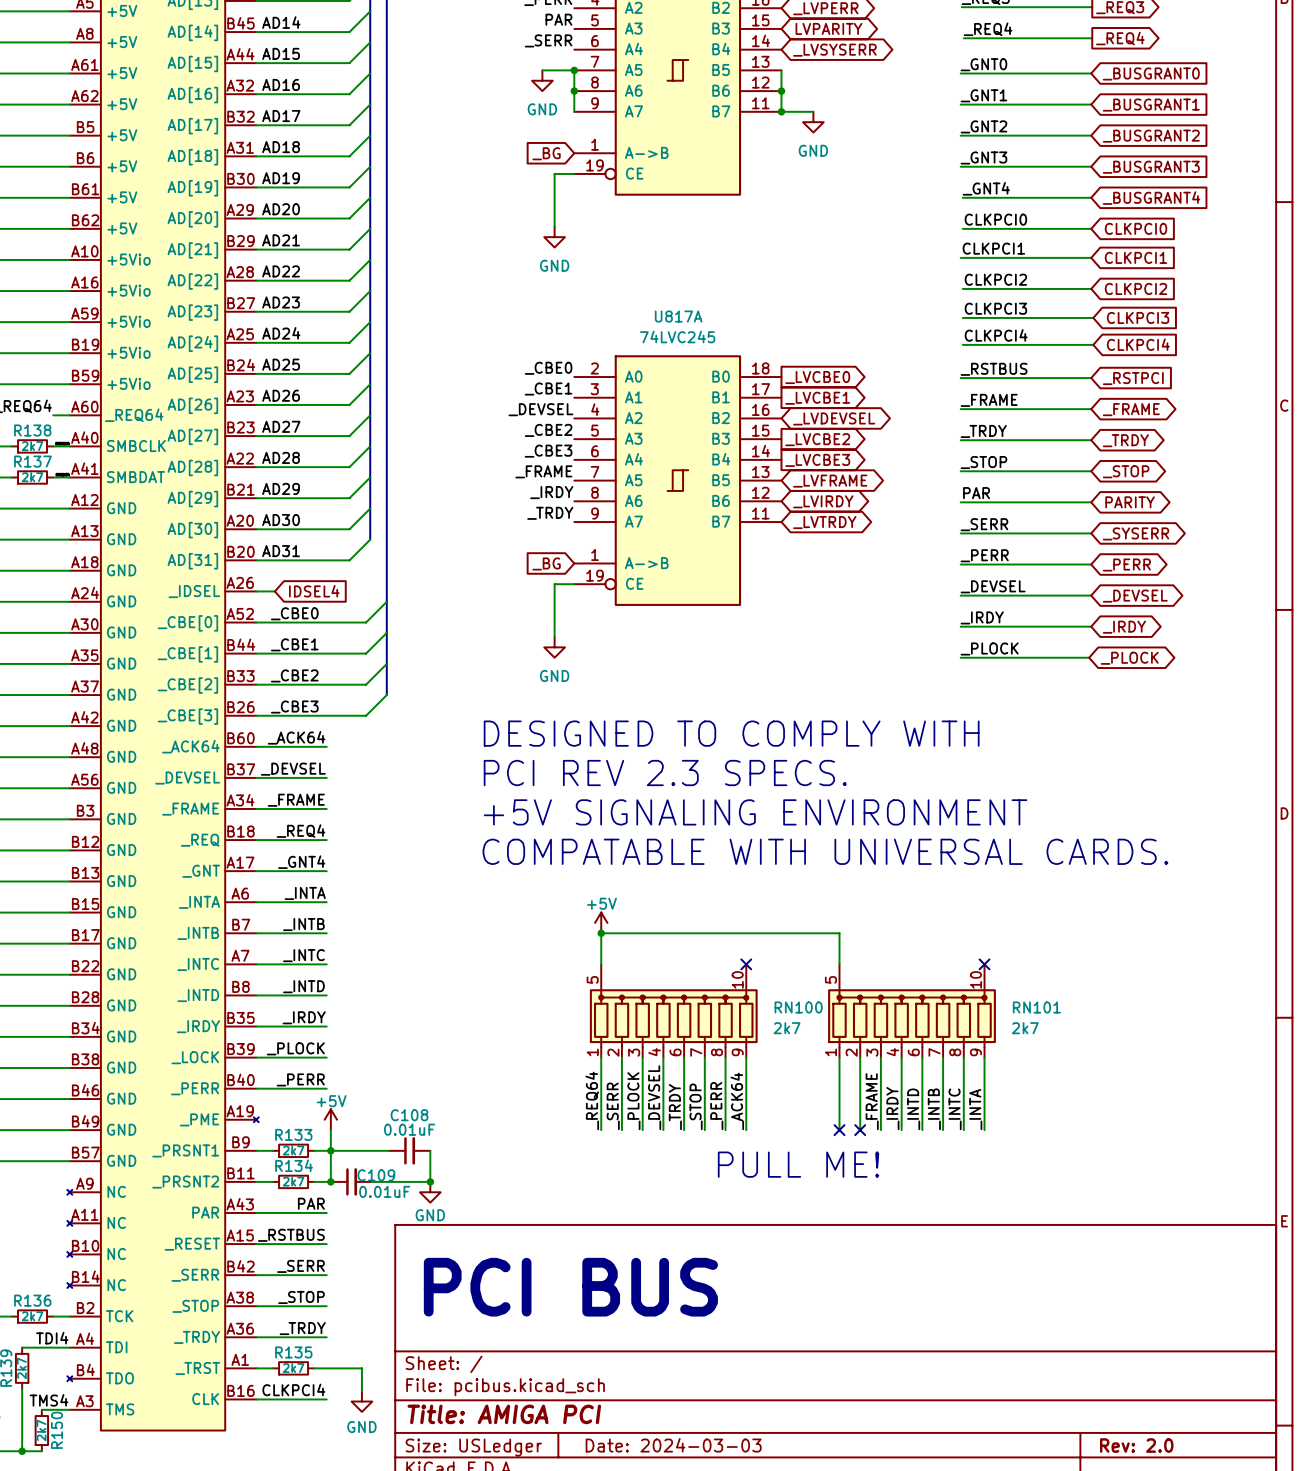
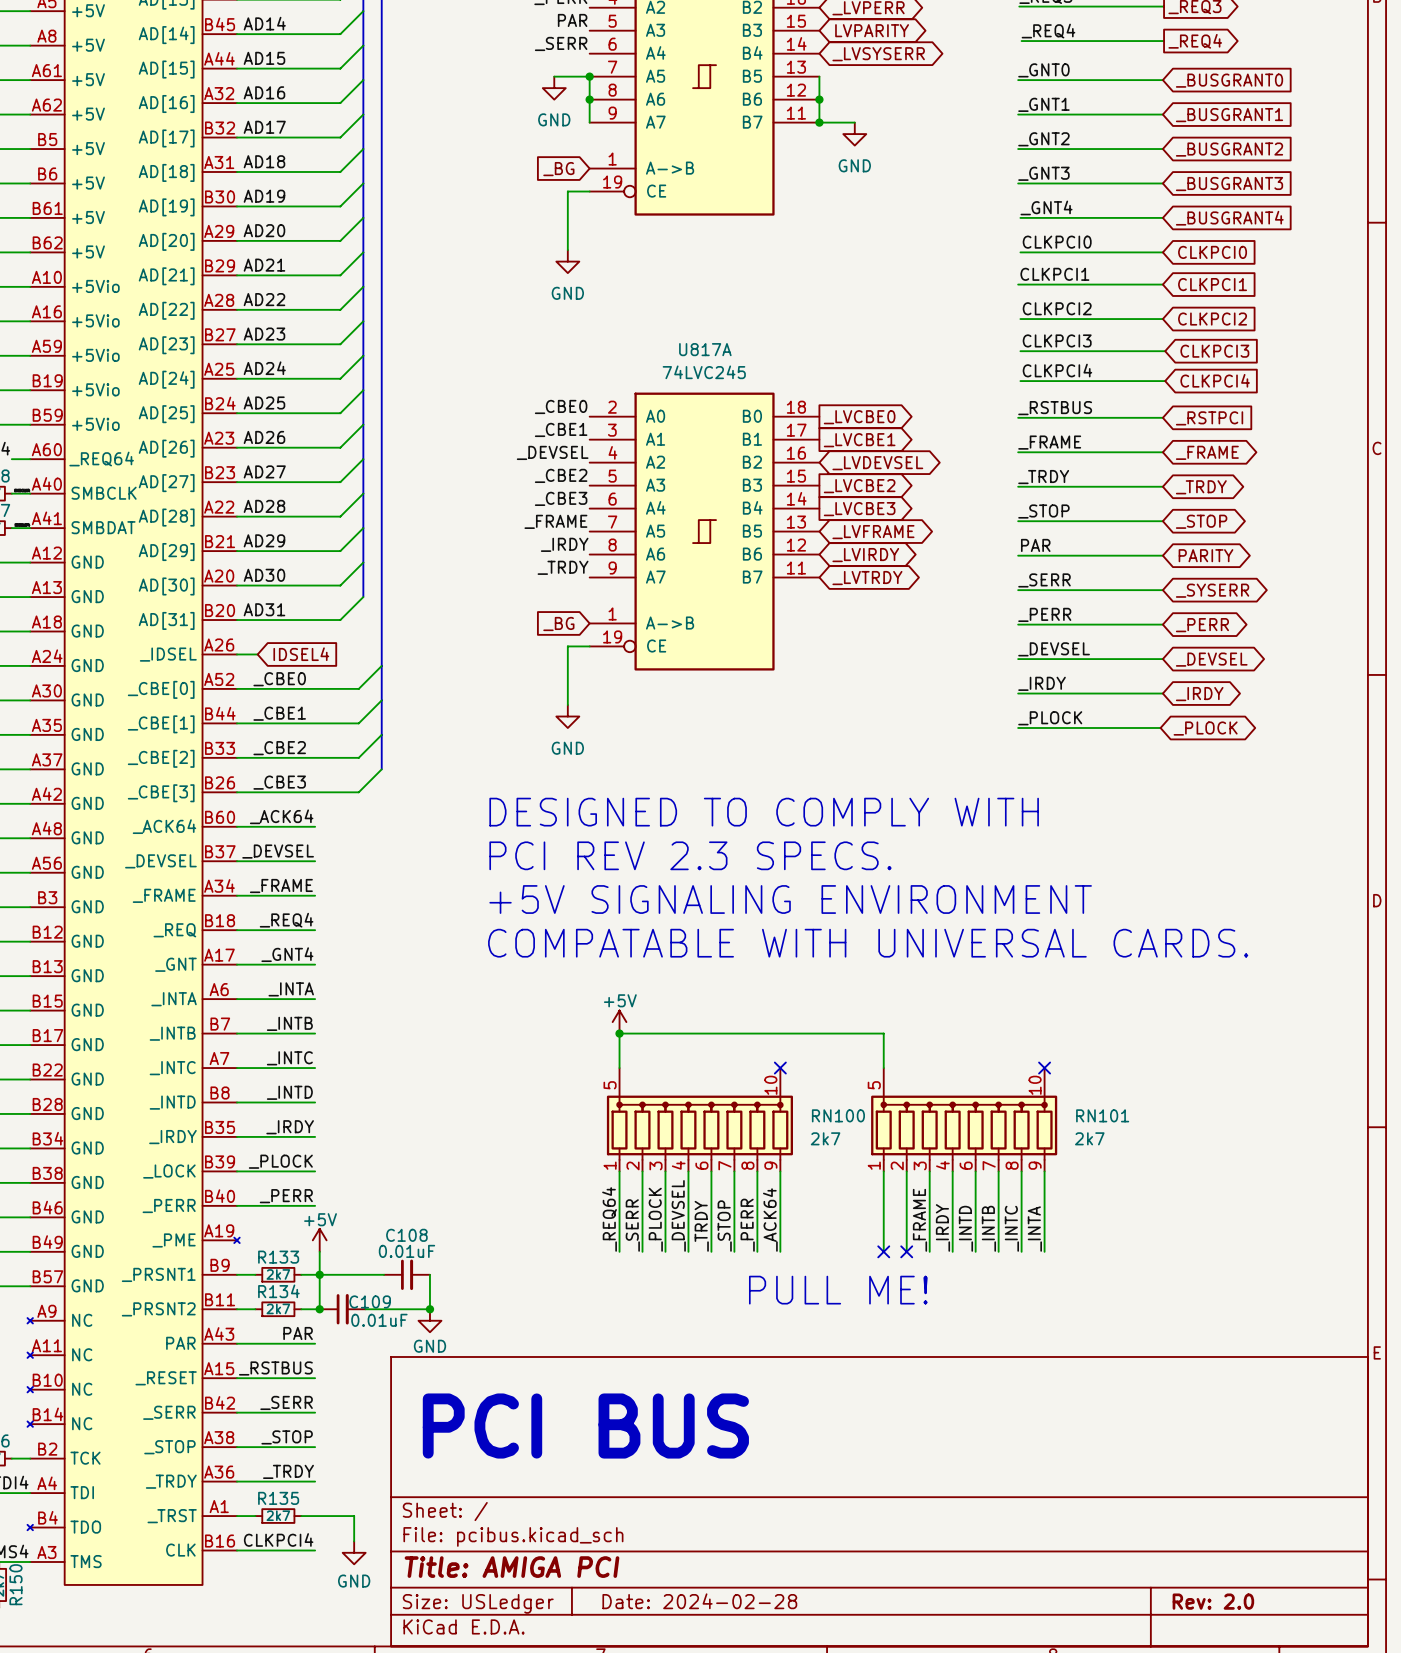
title block: Date: 2024-03-03 (673, 1445) -> Date: 2024-02-28 (699, 1601)

